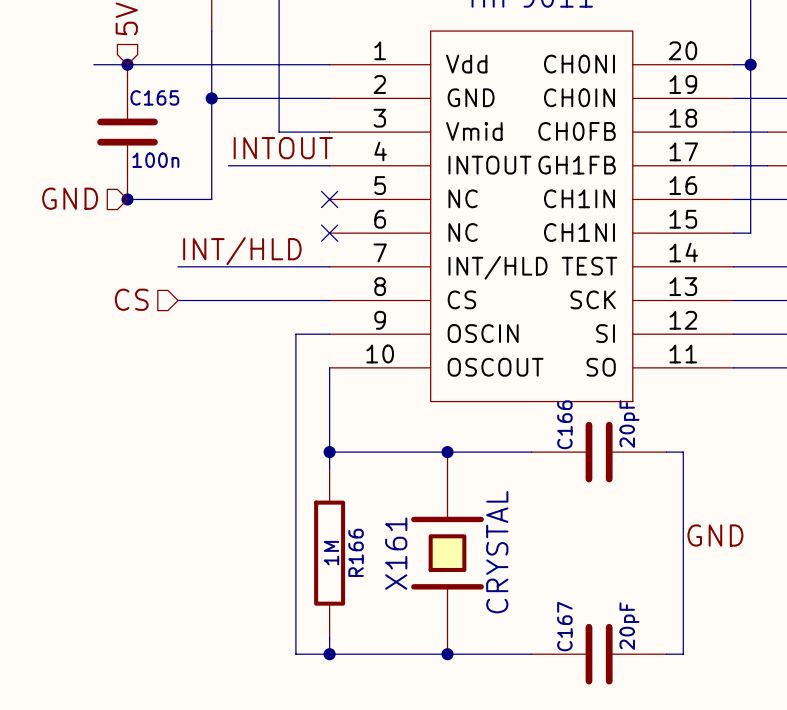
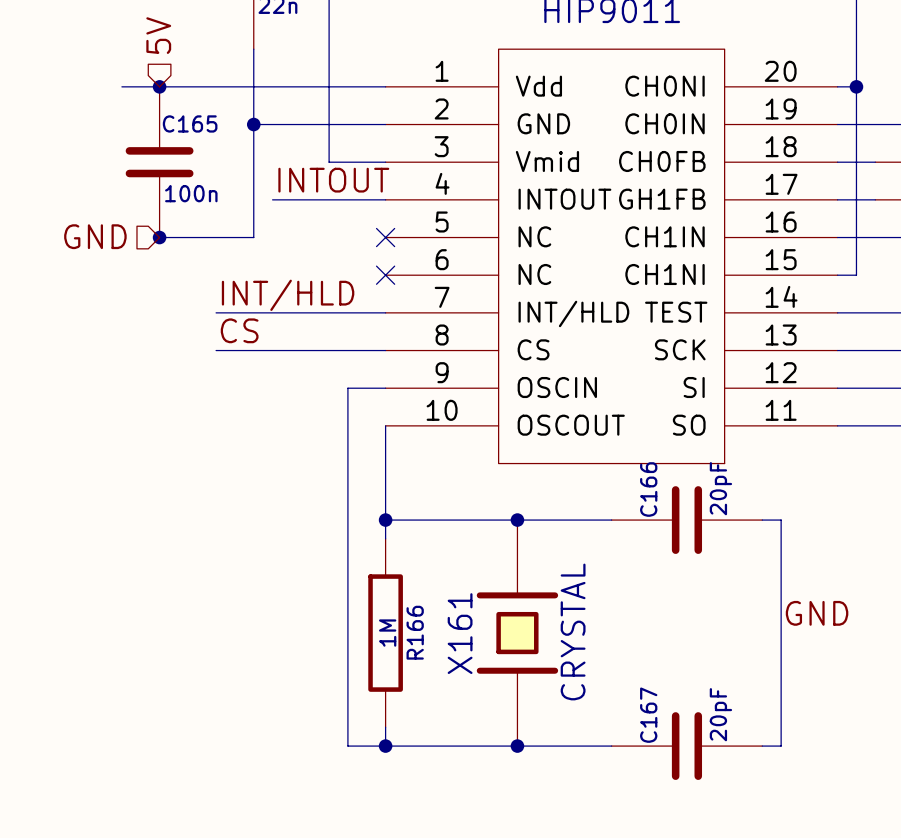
label: none -> CS (239, 330)
hierarchical label: CS (131, 299) -> none

